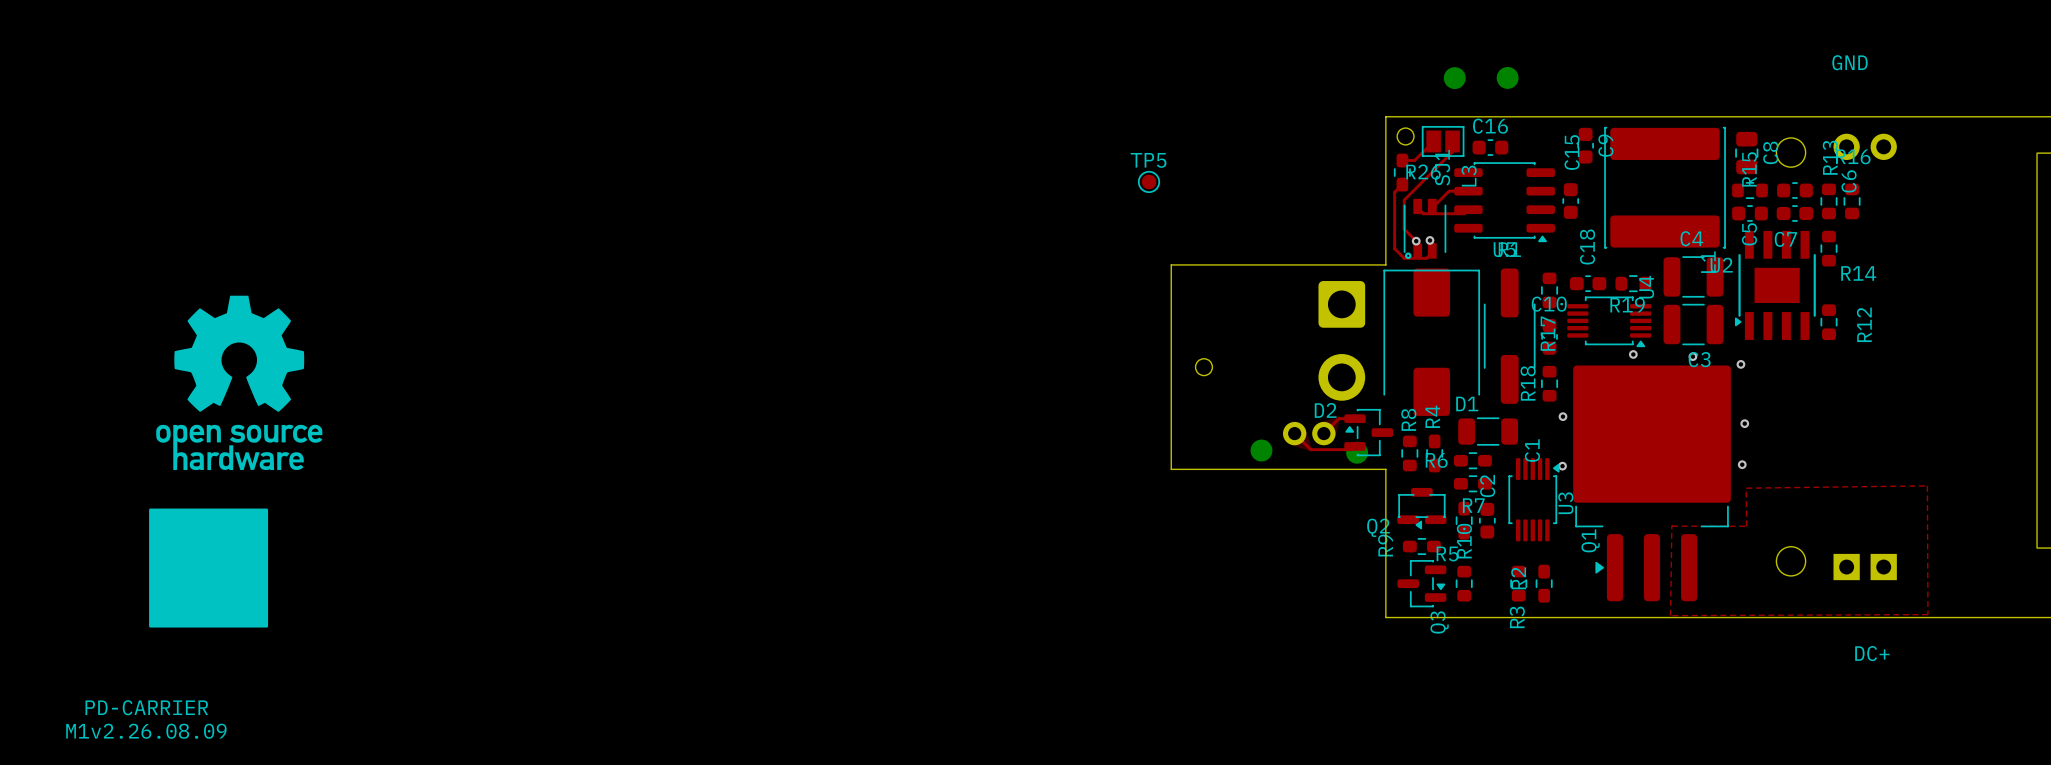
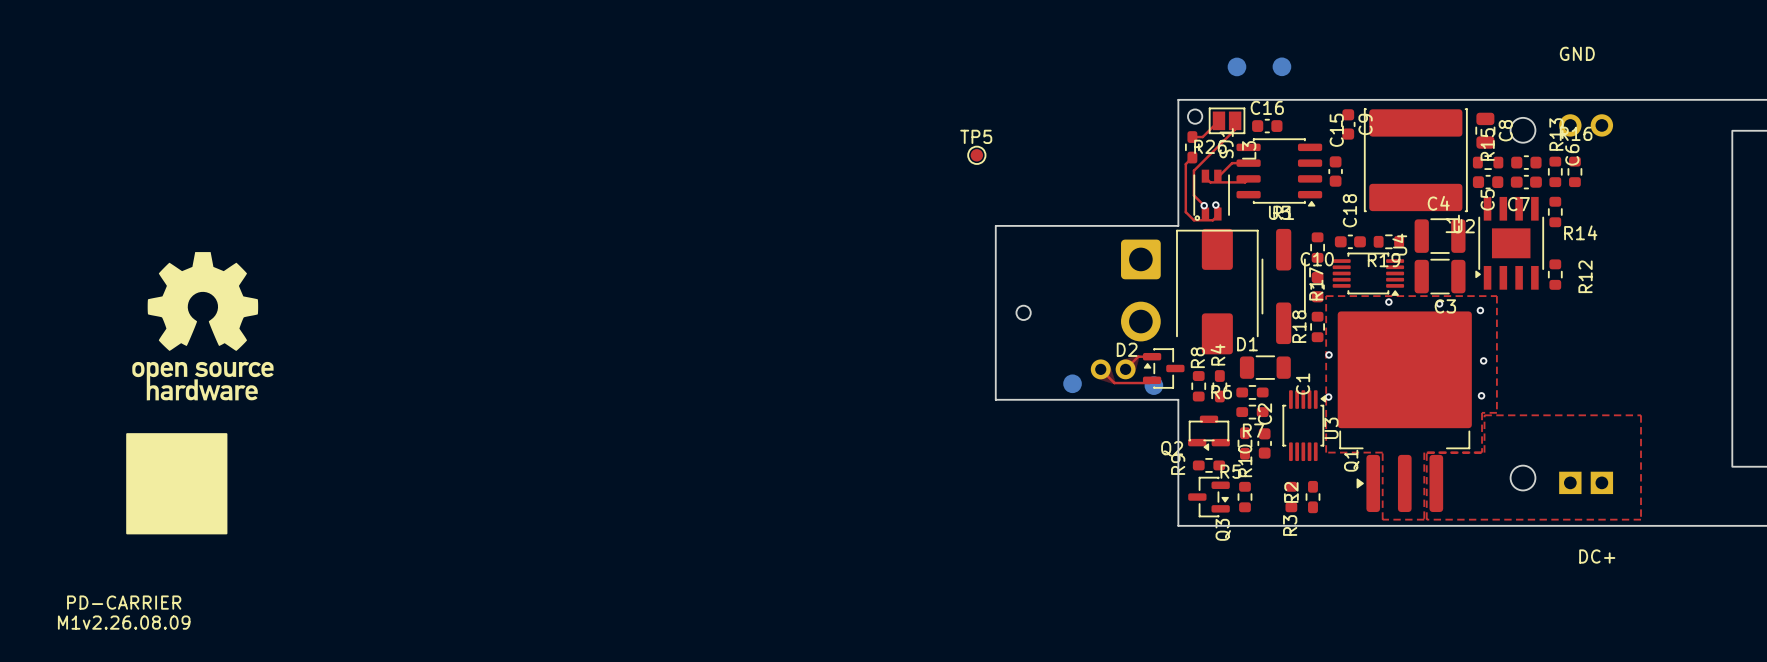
top zone outline: (1927, 485) (1746, 488) (1746, 526) (1671, 525) (1670, 615) (1927, 614) (1927, 485) -> none
top zone outline: none -> (1426, 452) (1426, 519) (1641, 519) (1641, 415) (1484, 415) (1484, 452) (1424, 452) (1424, 519) (1382, 519) (1382, 452) (1326, 452) (1326, 296) (1496, 296) (1496, 412) (1482, 412) (1482, 452)

